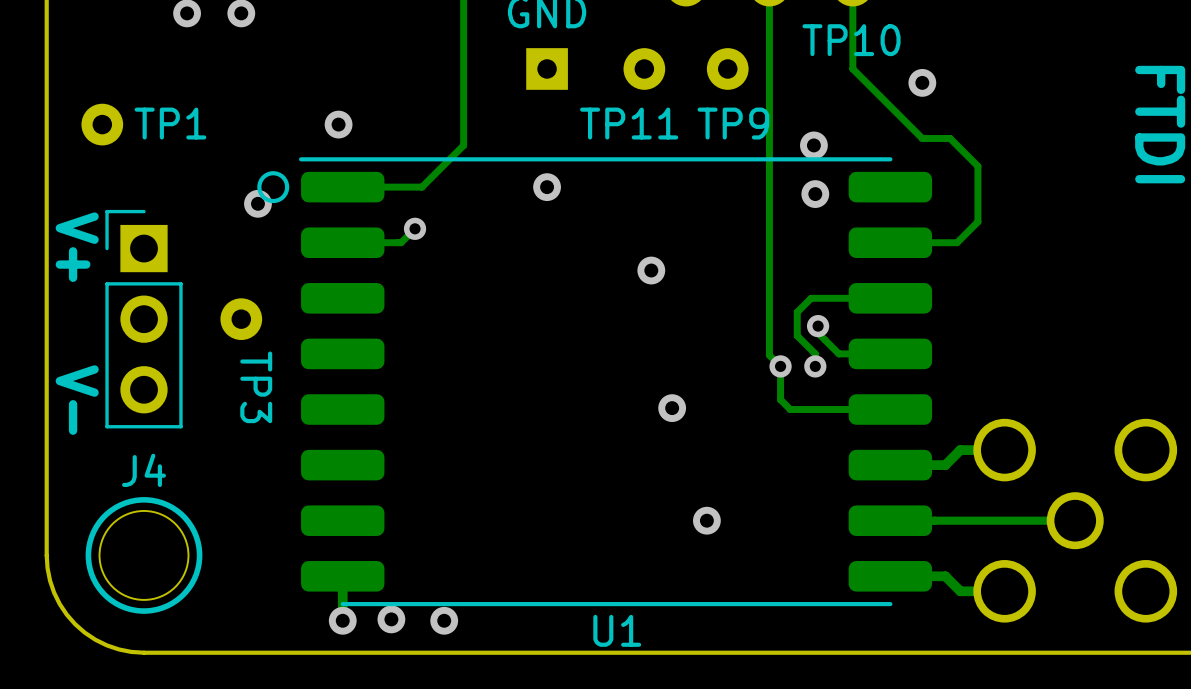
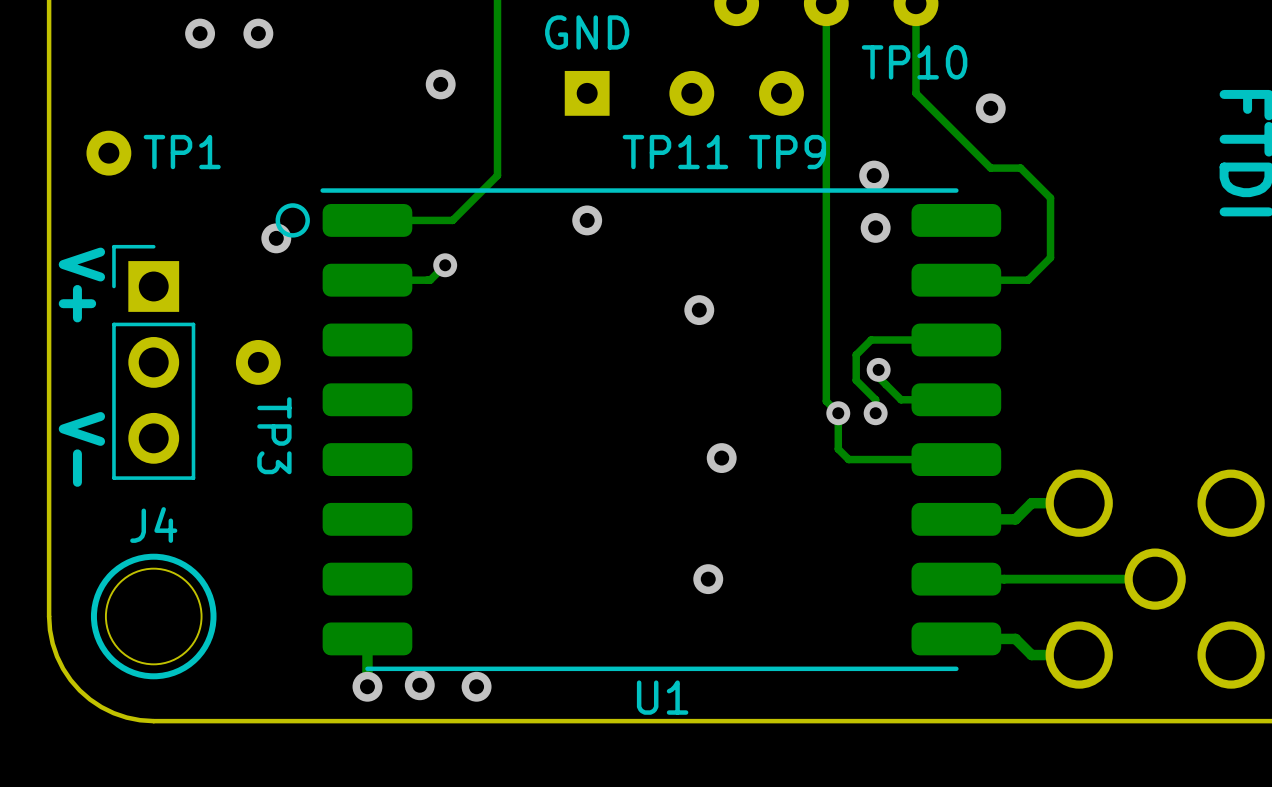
via position: (338, 124) -> (440, 84)
via position: (706, 520) -> (708, 579)

